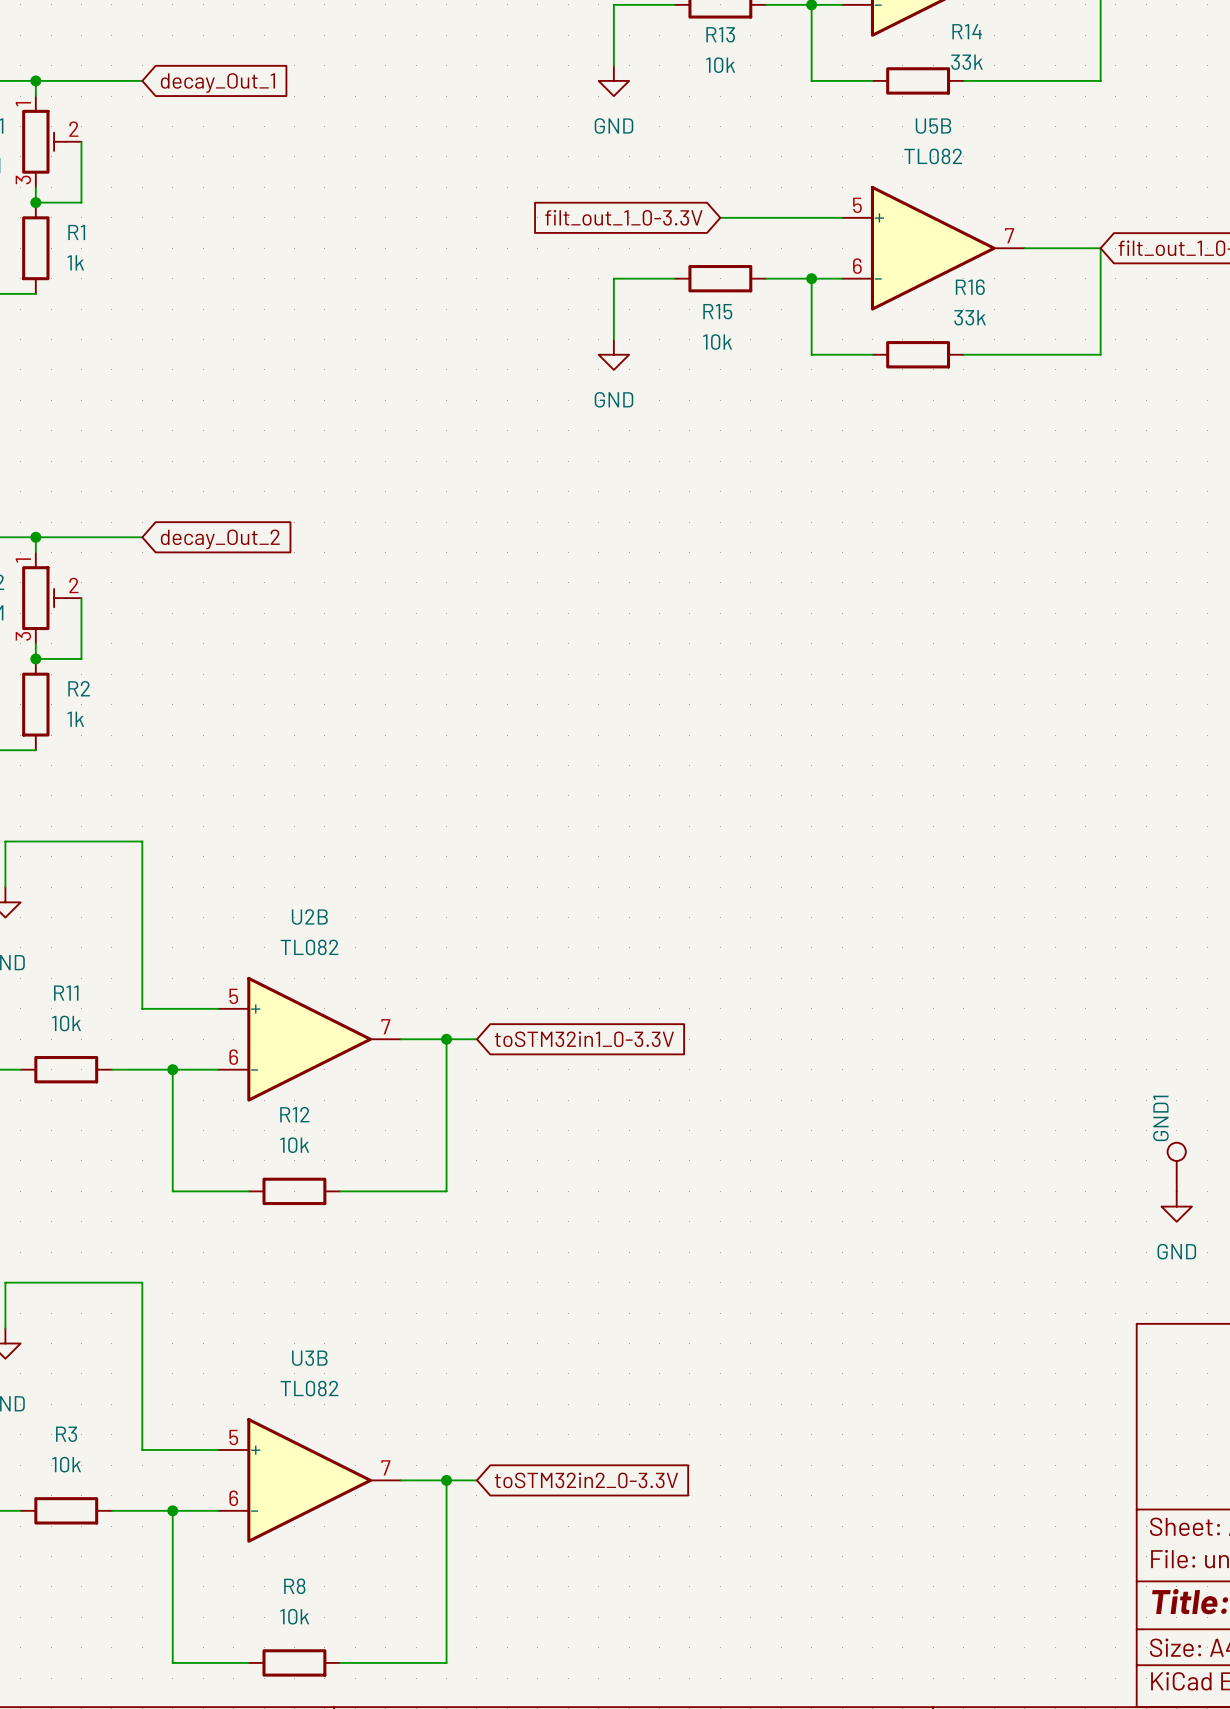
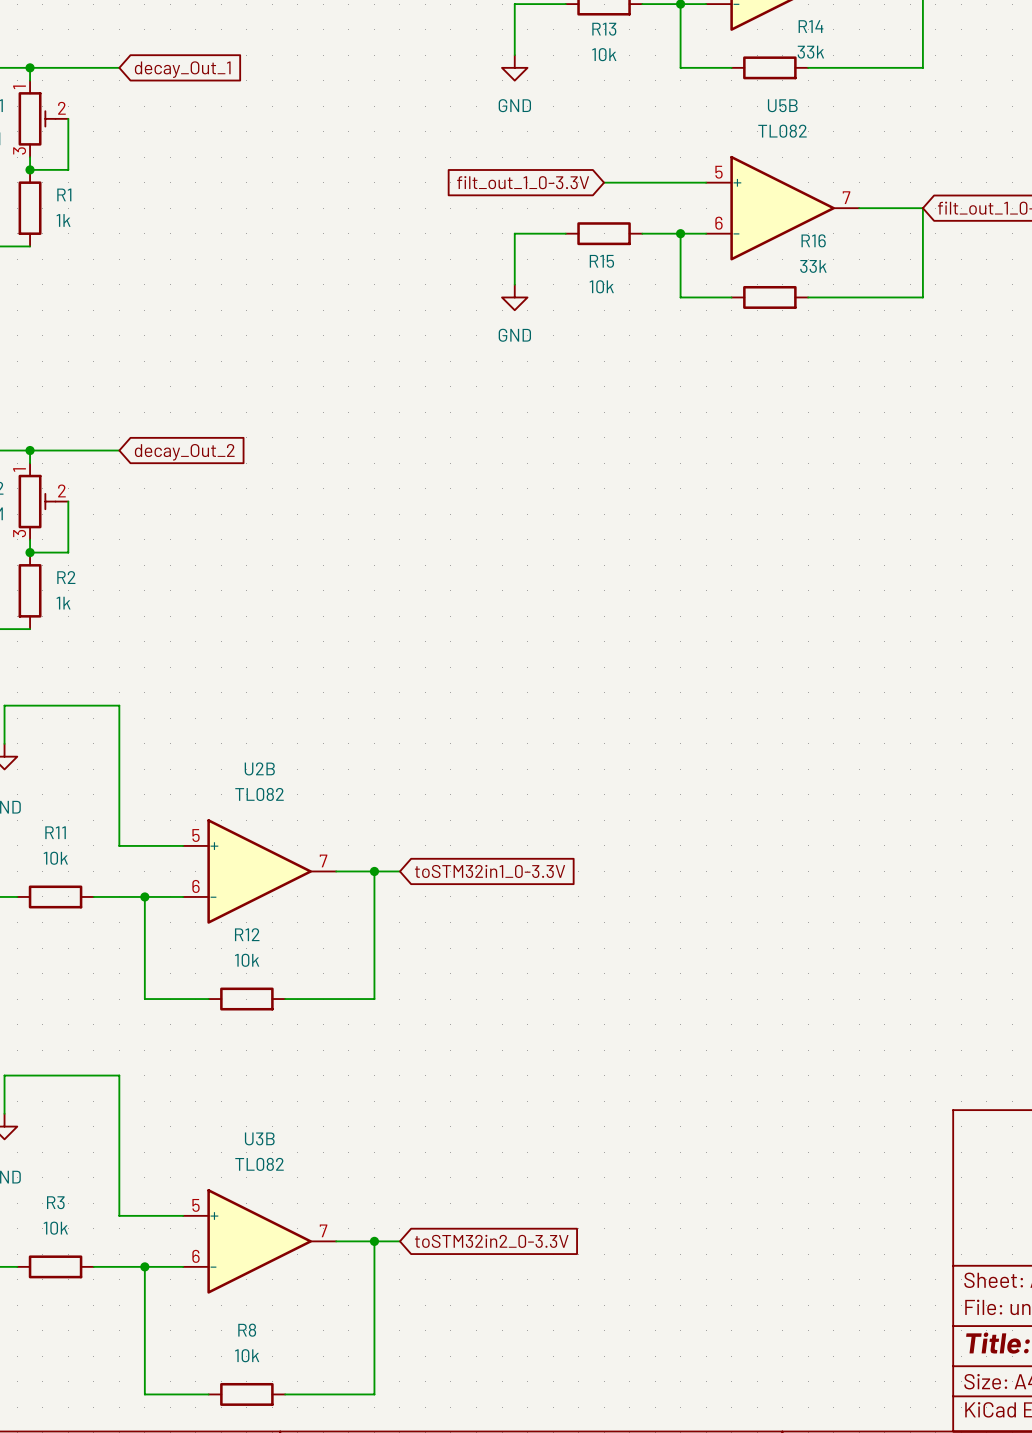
GND1: (1176, 1167) -> none
power symbol: GND (1176, 1206) -> none

